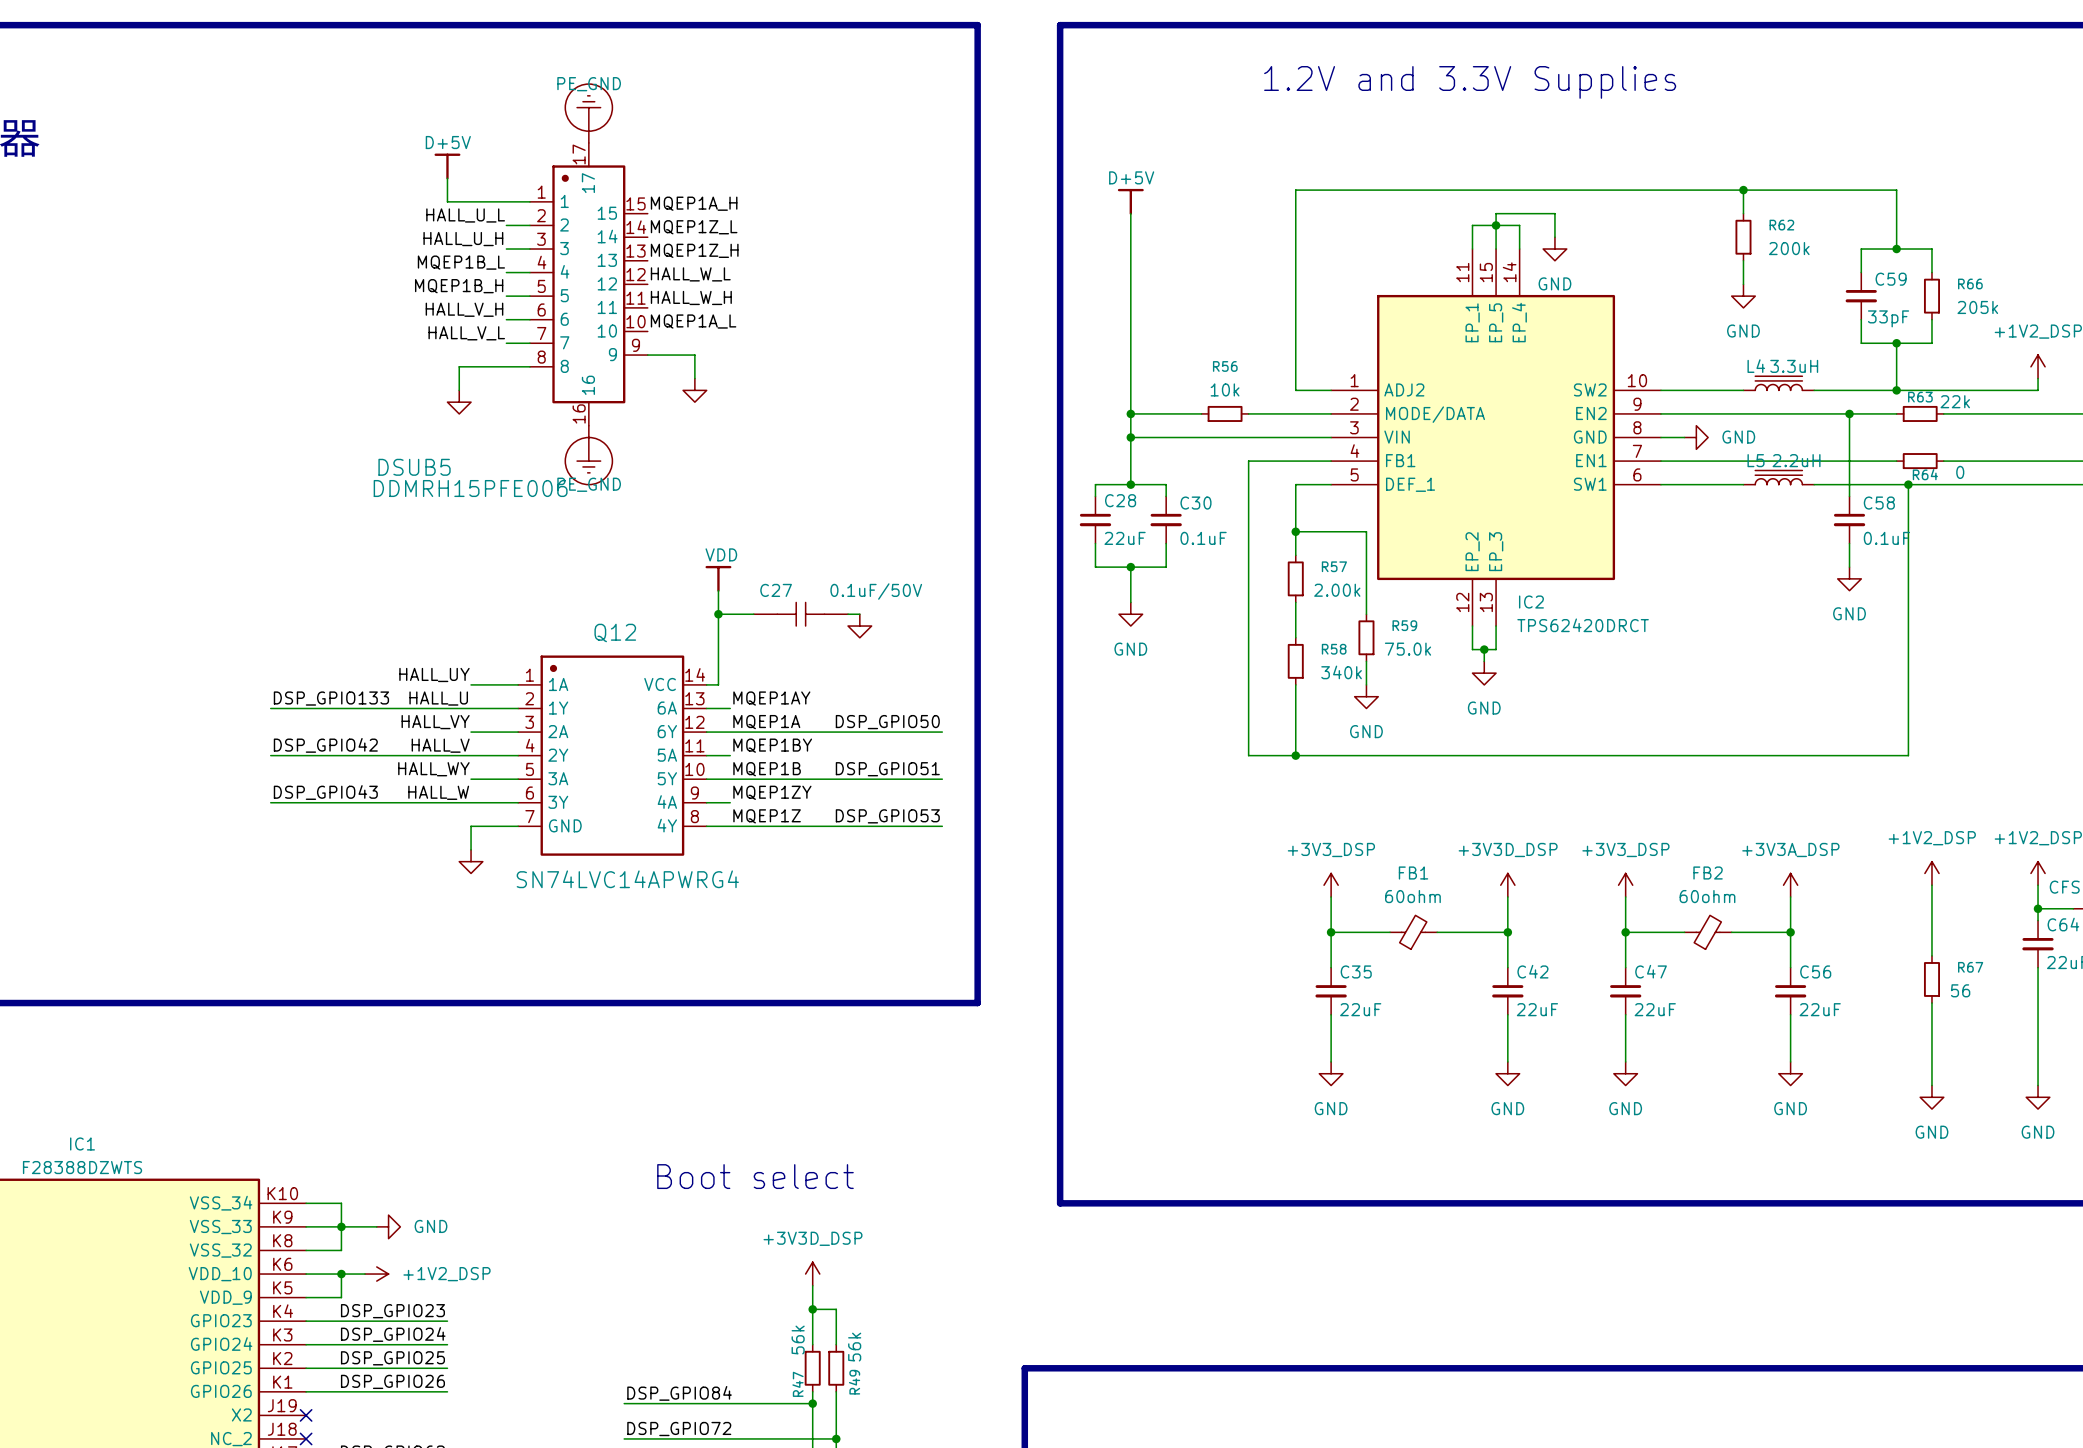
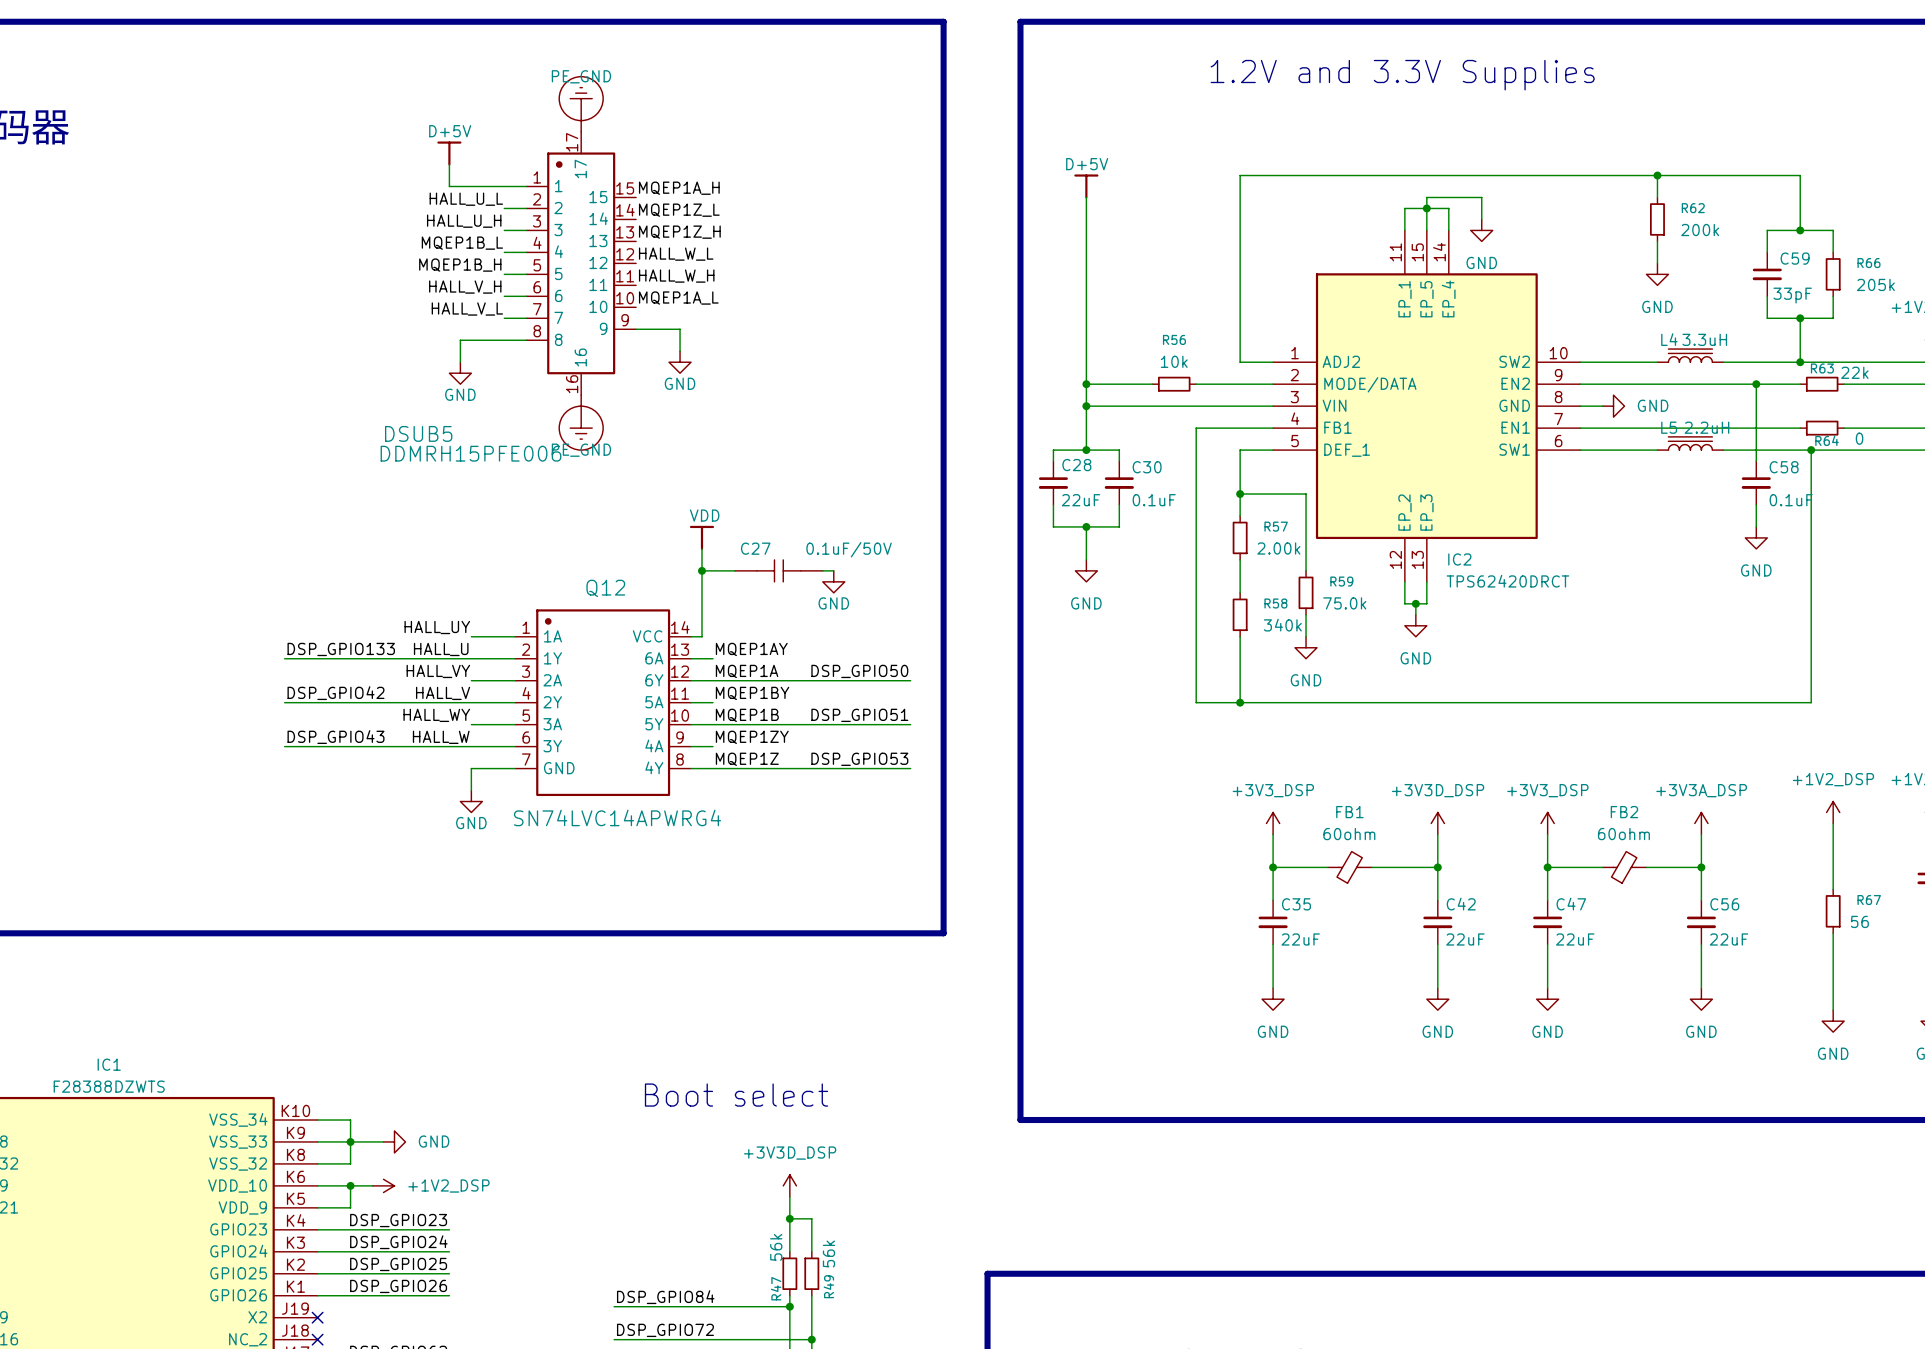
power symbol text: none -> GND (680, 383)
power symbol text: none -> GND (460, 394)
power symbol text: none -> GND (833, 603)
power symbol text: none -> GND (471, 823)

